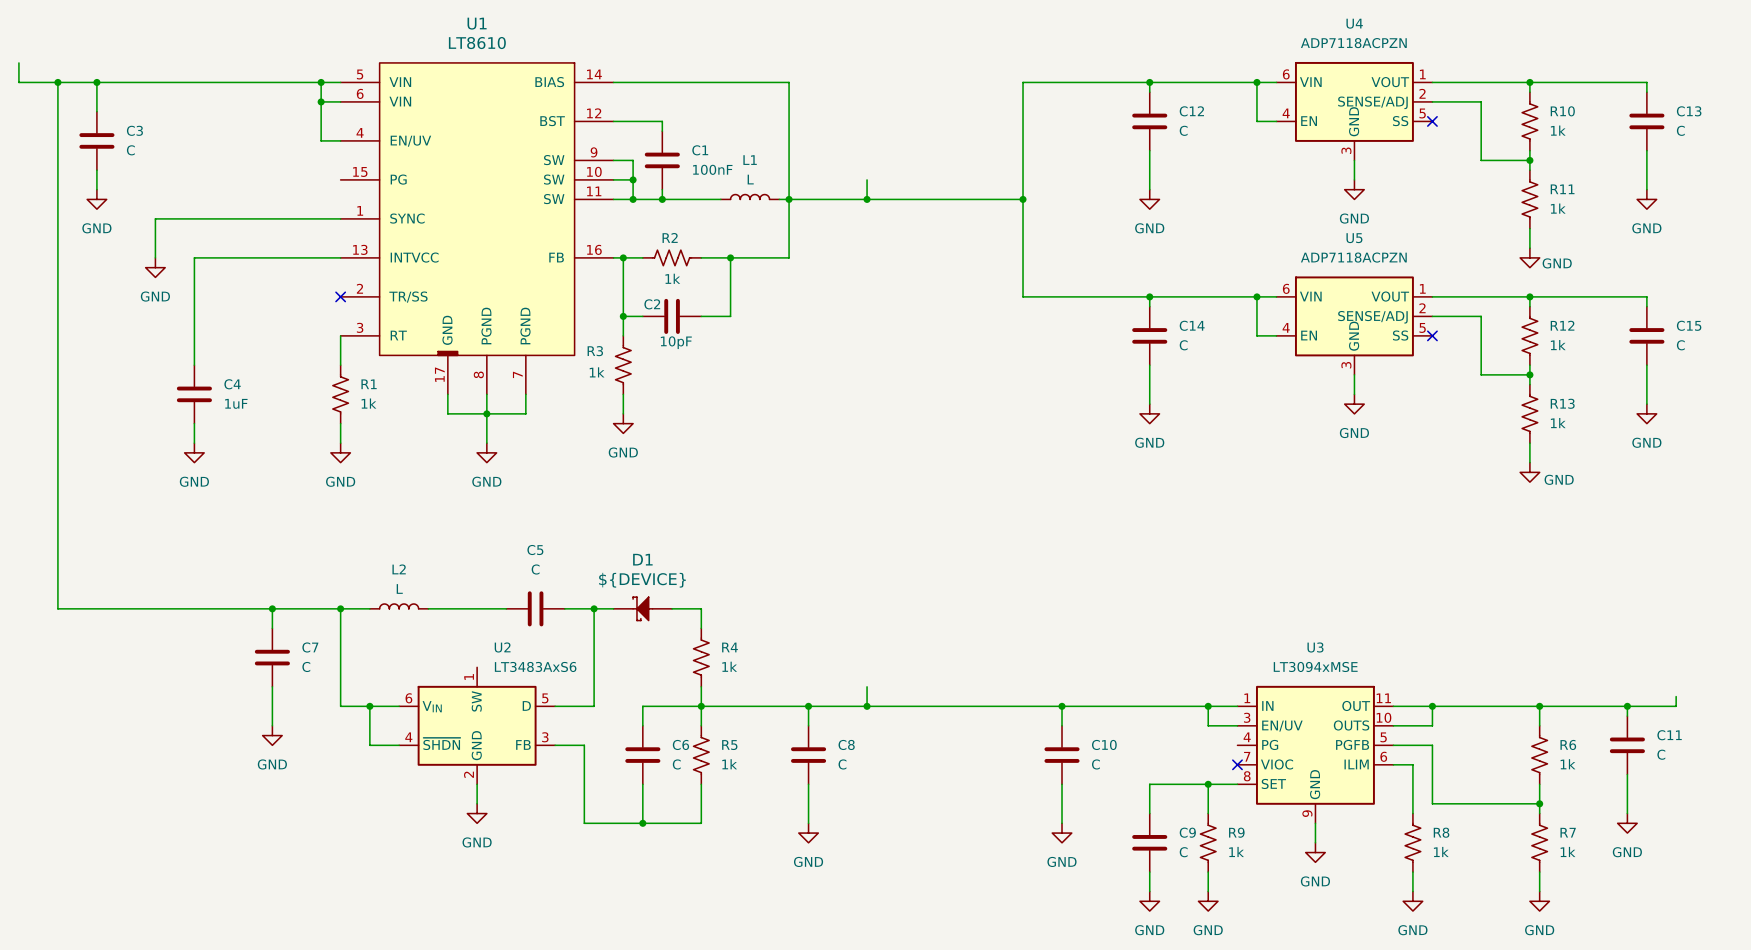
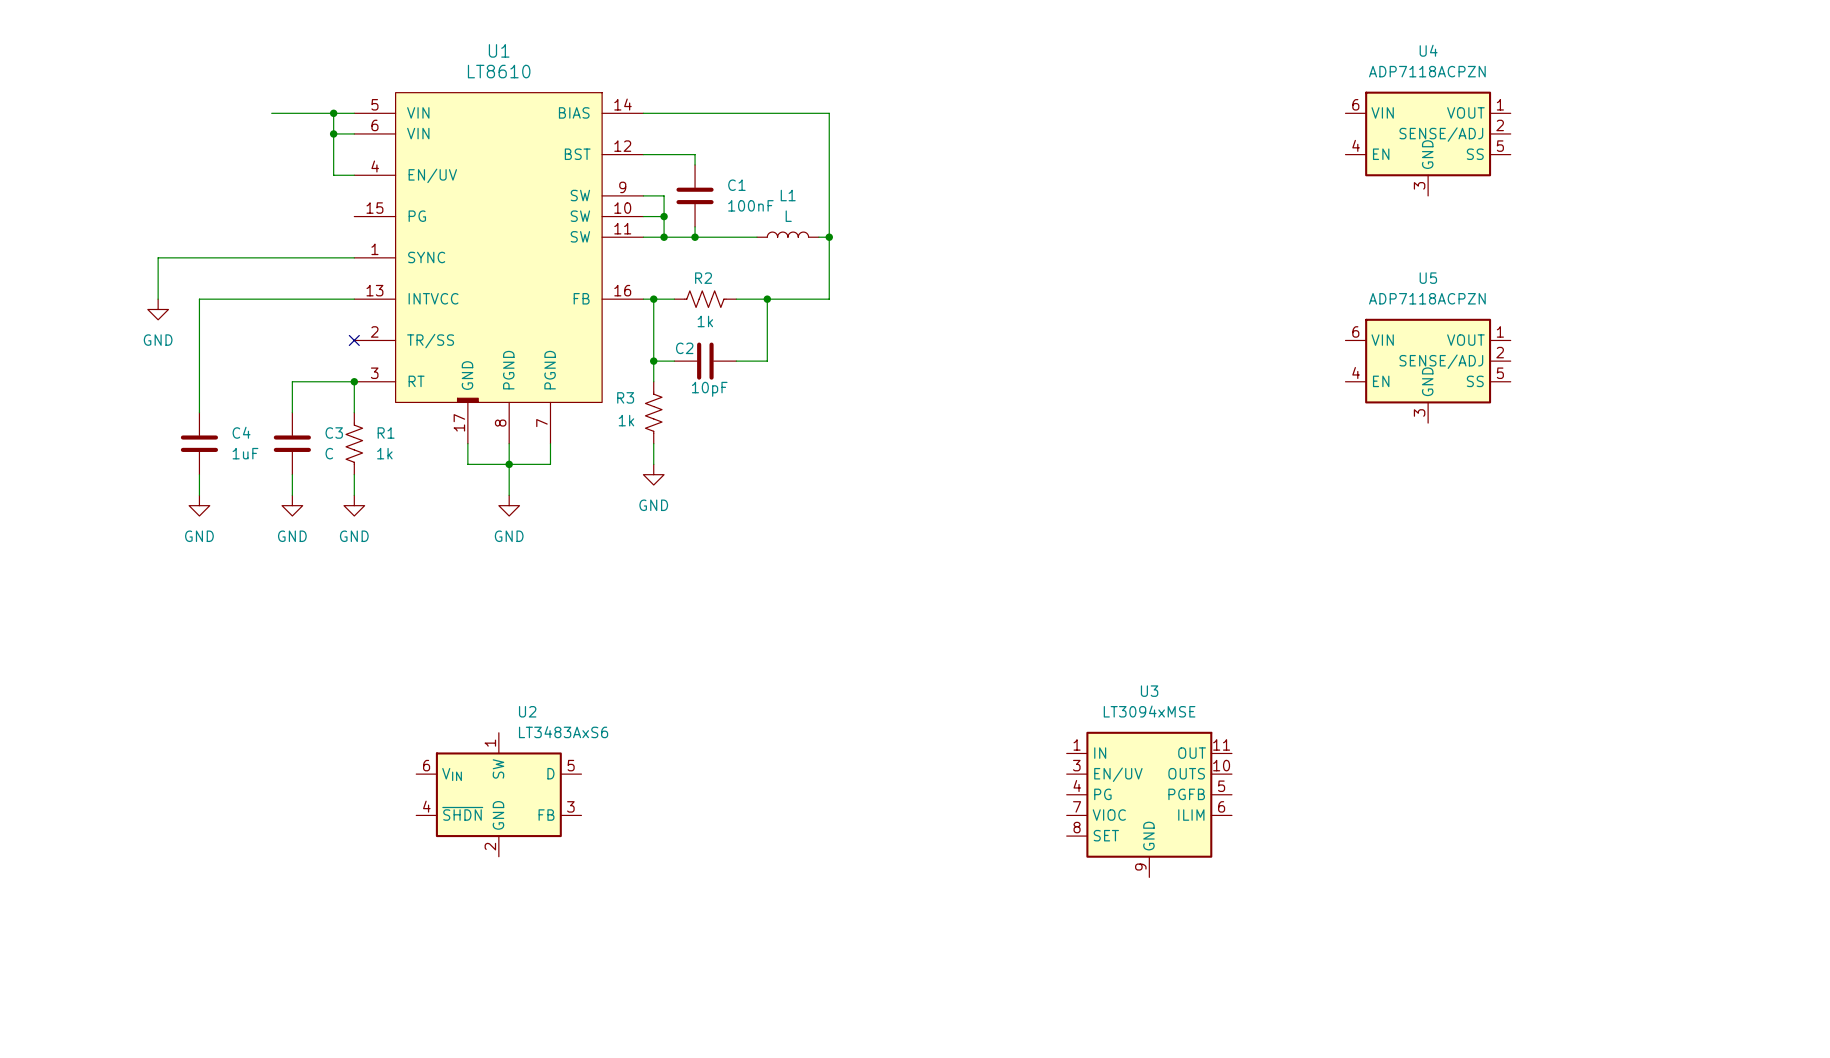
wire: (18, 62) (18, 82) (262, 82) -> none
wire: (57, 82) (57, 608) (369, 608) -> none
junction: (57, 82) -> none
wire: (96, 82) (96, 111) -> none
junction: (96, 82) -> none
wire: (1149, 82) (1149, 92) -> none
junction: (1149, 82) -> none
wire: (1256, 82) (1256, 121) (1276, 121) -> none
junction: (1256, 82) -> none
wire: (1276, 82) (1023, 82) (1023, 296) (1276, 296) -> none
wire: (1432, 82) (1646, 82) (1646, 92) -> none
wire: (1529, 82) (1529, 92) -> none
junction: (1529, 82) -> none
wire: (1432, 101) (1481, 101) (1481, 160) (1529, 160) -> none
C12: C (1149, 121) -> none
no-connect mark: (1432, 121) -> none
R10: 1k (1529, 121) -> none
C13: C (1646, 121) -> none
C3 position: (96, 140) -> (292, 443)
wire: (1149, 150) (1149, 189) -> none
wire: (1529, 150) (1529, 170) -> none
wire: (1646, 150) (1646, 189) -> none
wire: (1354, 160) (1354, 179) -> none
junction: (1529, 160) -> none
wire: (96, 170) (96, 189) -> none
wire: (867, 179) (867, 199) -> none
power symbol: GND (1354, 189) -> none
power symbol: GND (96, 199) -> none
wire: (789, 199) (1023, 199) -> none
junction: (867, 199) -> none
junction: (1023, 199) -> none
power symbol: GND (1149, 199) -> none
R11: 1k (1529, 199) -> none
power symbol: GND (1646, 199) -> none
wire: (1529, 228) (1529, 248) -> none
power symbol: GND (1529, 257) -> none
wire: (1149, 296) (1149, 306) -> none
junction: (1149, 296) -> none
wire: (1256, 296) (1256, 335) (1276, 335) -> none
junction: (1256, 296) -> none
wire: (1432, 296) (1646, 296) (1646, 306) -> none
wire: (1529, 296) (1529, 306) -> none
junction: (1529, 296) -> none
wire: (1432, 316) (1481, 316) (1481, 374) (1529, 374) -> none
wire: none -> (354, 381) (292, 381) (292, 412)
junction: none -> (354, 381)
C14: C (1149, 335) -> none
no-connect mark: (1432, 335) -> none
R12: 1k (1529, 335) -> none
C15: C (1646, 335) -> none
wire: (1149, 365) (1149, 404) -> none
wire: (1529, 365) (1529, 384) -> none
wire: (1646, 365) (1646, 404) -> none
wire: (1354, 374) (1354, 394) -> none
junction: (1529, 374) -> none
power symbol: GND (1354, 404) -> none
power symbol: GND (1149, 413) -> none
R13: 1k (1529, 413) -> none
power symbol: GND (1646, 413) -> none
wire: (1529, 443) (1529, 462) -> none
power symbol: none -> GND (292, 505)
power symbol: GND (1529, 472) -> none
L2: L (399, 606) -> none
wire: (272, 608) (272, 628) -> (292, 474) (292, 495)
junction: (272, 608) -> none
wire: (340, 608) (340, 706) (399, 706) -> none
junction: (340, 608) -> none
wire: (428, 608) (506, 608) -> none
C5: C (535, 608) -> none
wire: (564, 608) (613, 608) -> none
wire: (594, 608) (594, 706) (555, 706) -> none
junction: (594, 608) -> none
D1: ${DEVICE} (642, 608) -> none
wire: (672, 608) (701, 608) (701, 628) -> none
C7: C (272, 657) -> none
R4: 1k (701, 657) -> none
wire: (272, 686) (272, 725) -> none
wire: (701, 686) (701, 725) -> none
wire: (867, 686) (867, 706) -> none
wire: (1676, 696) (1676, 706) (1393, 706) -> none
wire: (369, 706) (369, 745) (399, 745) -> none
junction: (369, 706) -> none
junction: (701, 706) -> none
wire: (808, 706) (808, 725) -> none
junction: (808, 706) -> none
junction: (867, 706) -> none
junction: (1062, 706) -> none
wire: (1208, 706) (1208, 725) (1237, 725) -> none
junction: (1208, 706) -> none
wire: (1237, 706) (642, 706) (642, 725) -> none
wire: (1432, 706) (1432, 725) (1393, 725) -> none
junction: (1432, 706) -> none
wire: (1539, 706) (1539, 725) -> none
junction: (1539, 706) -> none
wire: (1627, 706) (1627, 716) -> none
junction: (1627, 706) -> none
power symbol: GND (272, 735) -> none
wire: (555, 745) (584, 745) (584, 823) (701, 823) (701, 784) -> none
wire: (1393, 745) (1432, 745) (1432, 803) (1539, 803) -> none
C11: C (1627, 745) -> none
U3 position: (1315, 754) -> (1149, 804)
C6: C (642, 755) -> none
R5: 1k (701, 755) -> none
C8: C (808, 755) -> none
C10: C (1062, 755) -> none
R6: 1k (1539, 755) -> none
no-connect mark: (1237, 764) -> none
wire: (1393, 764) (1412, 764) (1412, 813) -> none
wire: (1627, 774) (1627, 813) -> none
wire: (477, 784) (477, 803) -> none
wire: (642, 784) (642, 823) -> none
wire: (808, 784) (808, 823) -> none
wire: (1062, 784) (1062, 823) -> none
wire: (1208, 784) (1208, 813) -> none
junction: (1208, 784) -> none
wire: (1237, 784) (1149, 784) (1149, 813) -> none
wire: (1539, 784) (1539, 813) -> none
junction: (1539, 803) -> none
power symbol: GND (477, 813) -> none
junction: (642, 823) -> none
wire: (1315, 823) (1315, 842) -> none
power symbol: GND (1627, 823) -> none
power symbol: GND (808, 833) -> none
power symbol: GND (1062, 833) -> none
C9: C (1149, 842) -> none
R9: 1k (1208, 842) -> none
R8: 1k (1412, 842) -> none
R7: 1k (1539, 842) -> none
power symbol: GND (1315, 852) -> none
wire: (1149, 872) (1149, 891) -> none
wire: (1208, 872) (1208, 891) -> none
wire: (1412, 872) (1412, 891) -> none
wire: (1539, 872) (1539, 891) -> none
power symbol: GND (1149, 901) -> none
power symbol: GND (1208, 901) -> none
power symbol: GND (1412, 901) -> none
power symbol: GND (1539, 901) -> none

